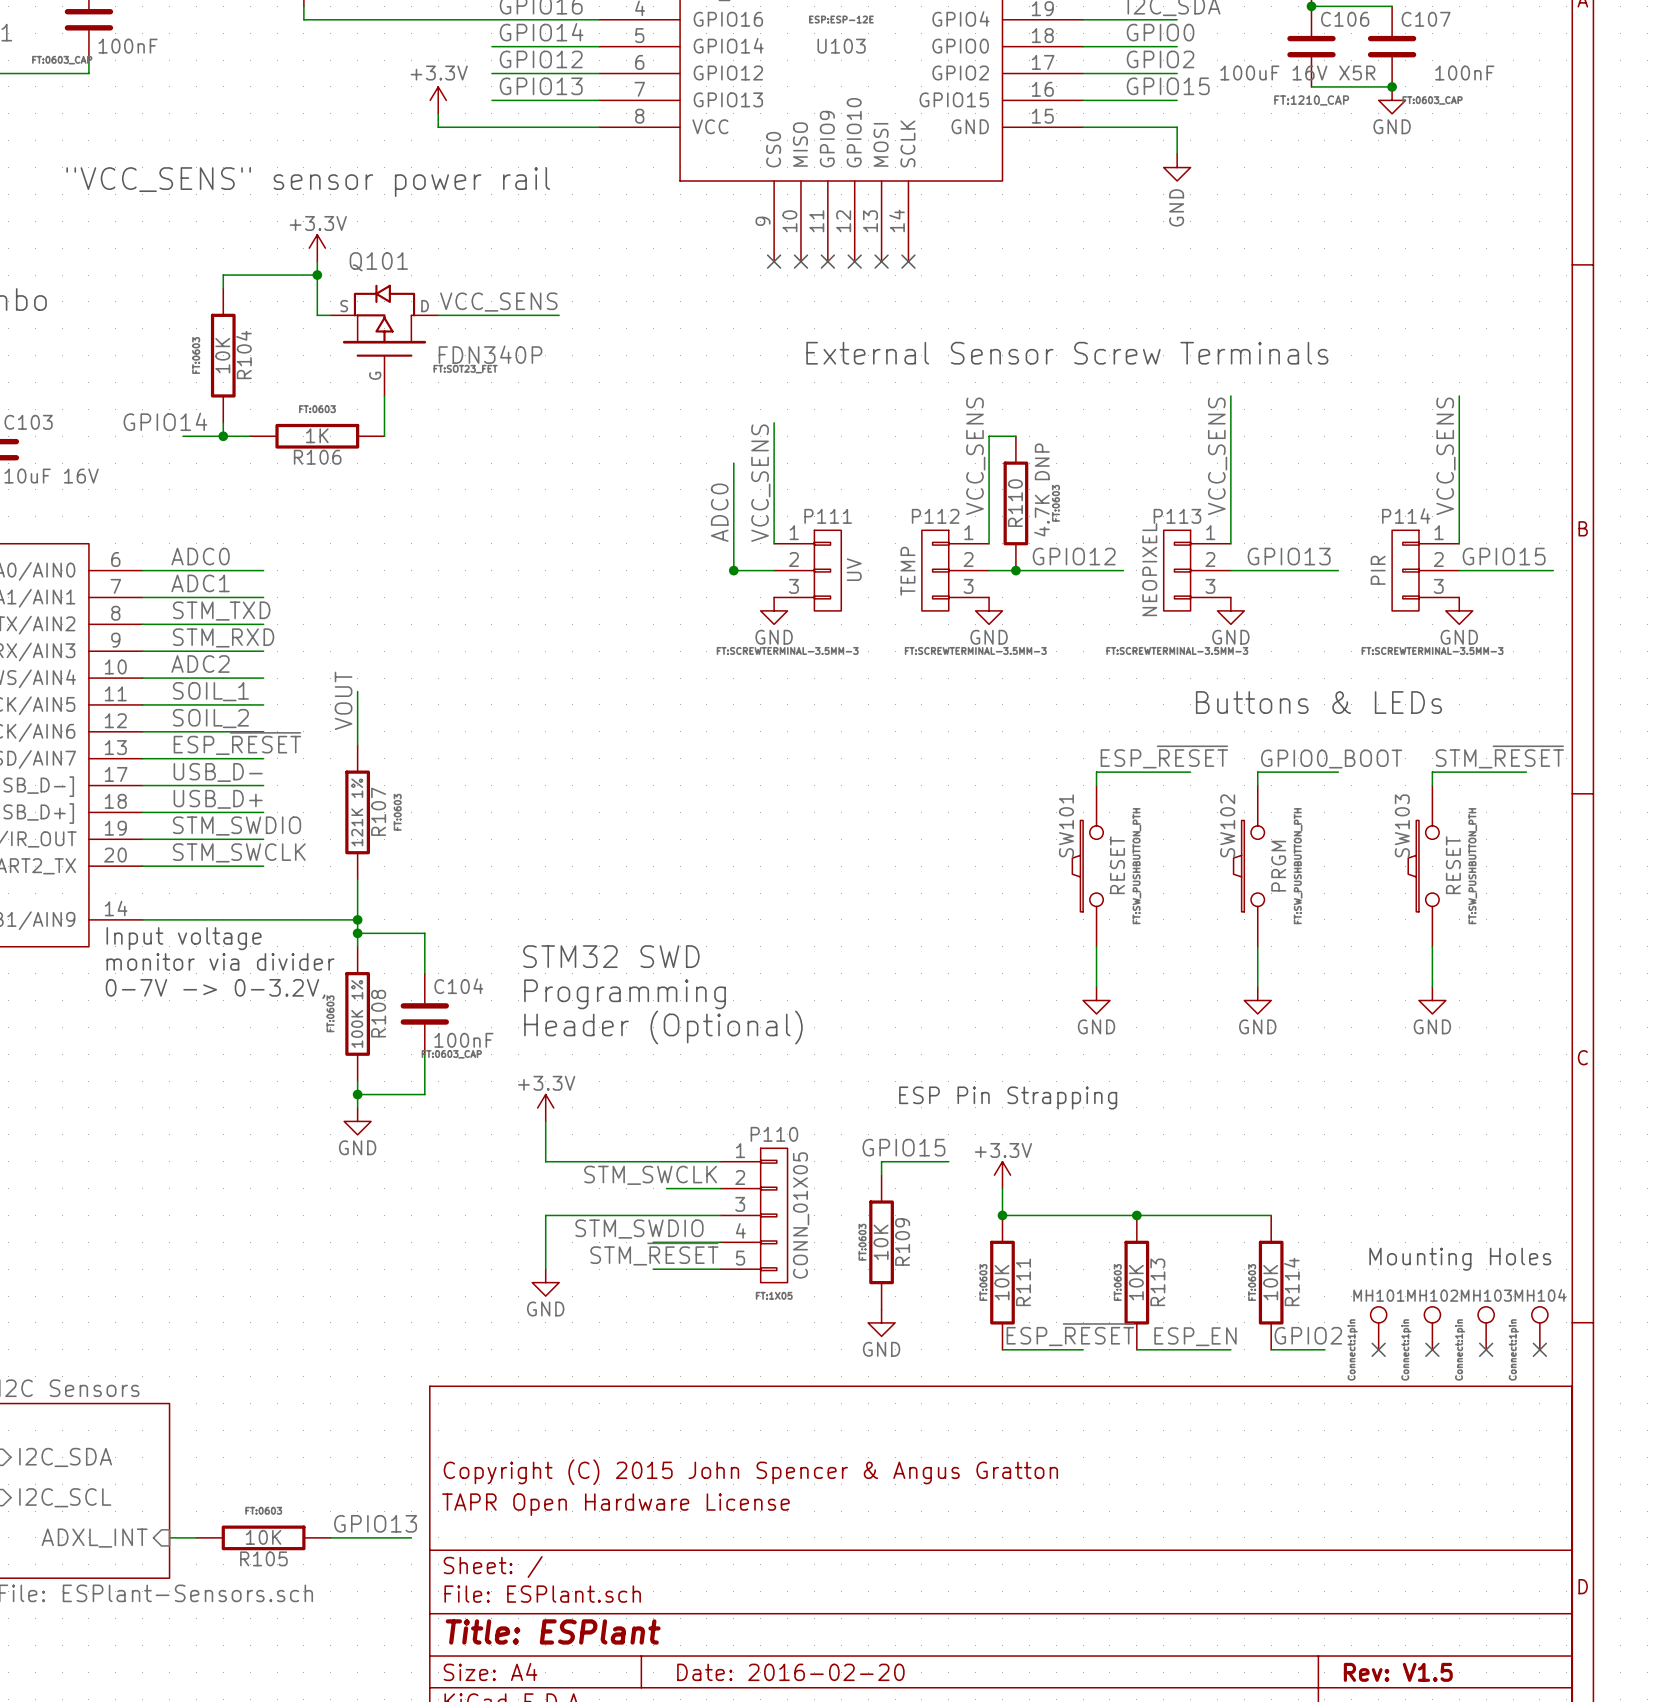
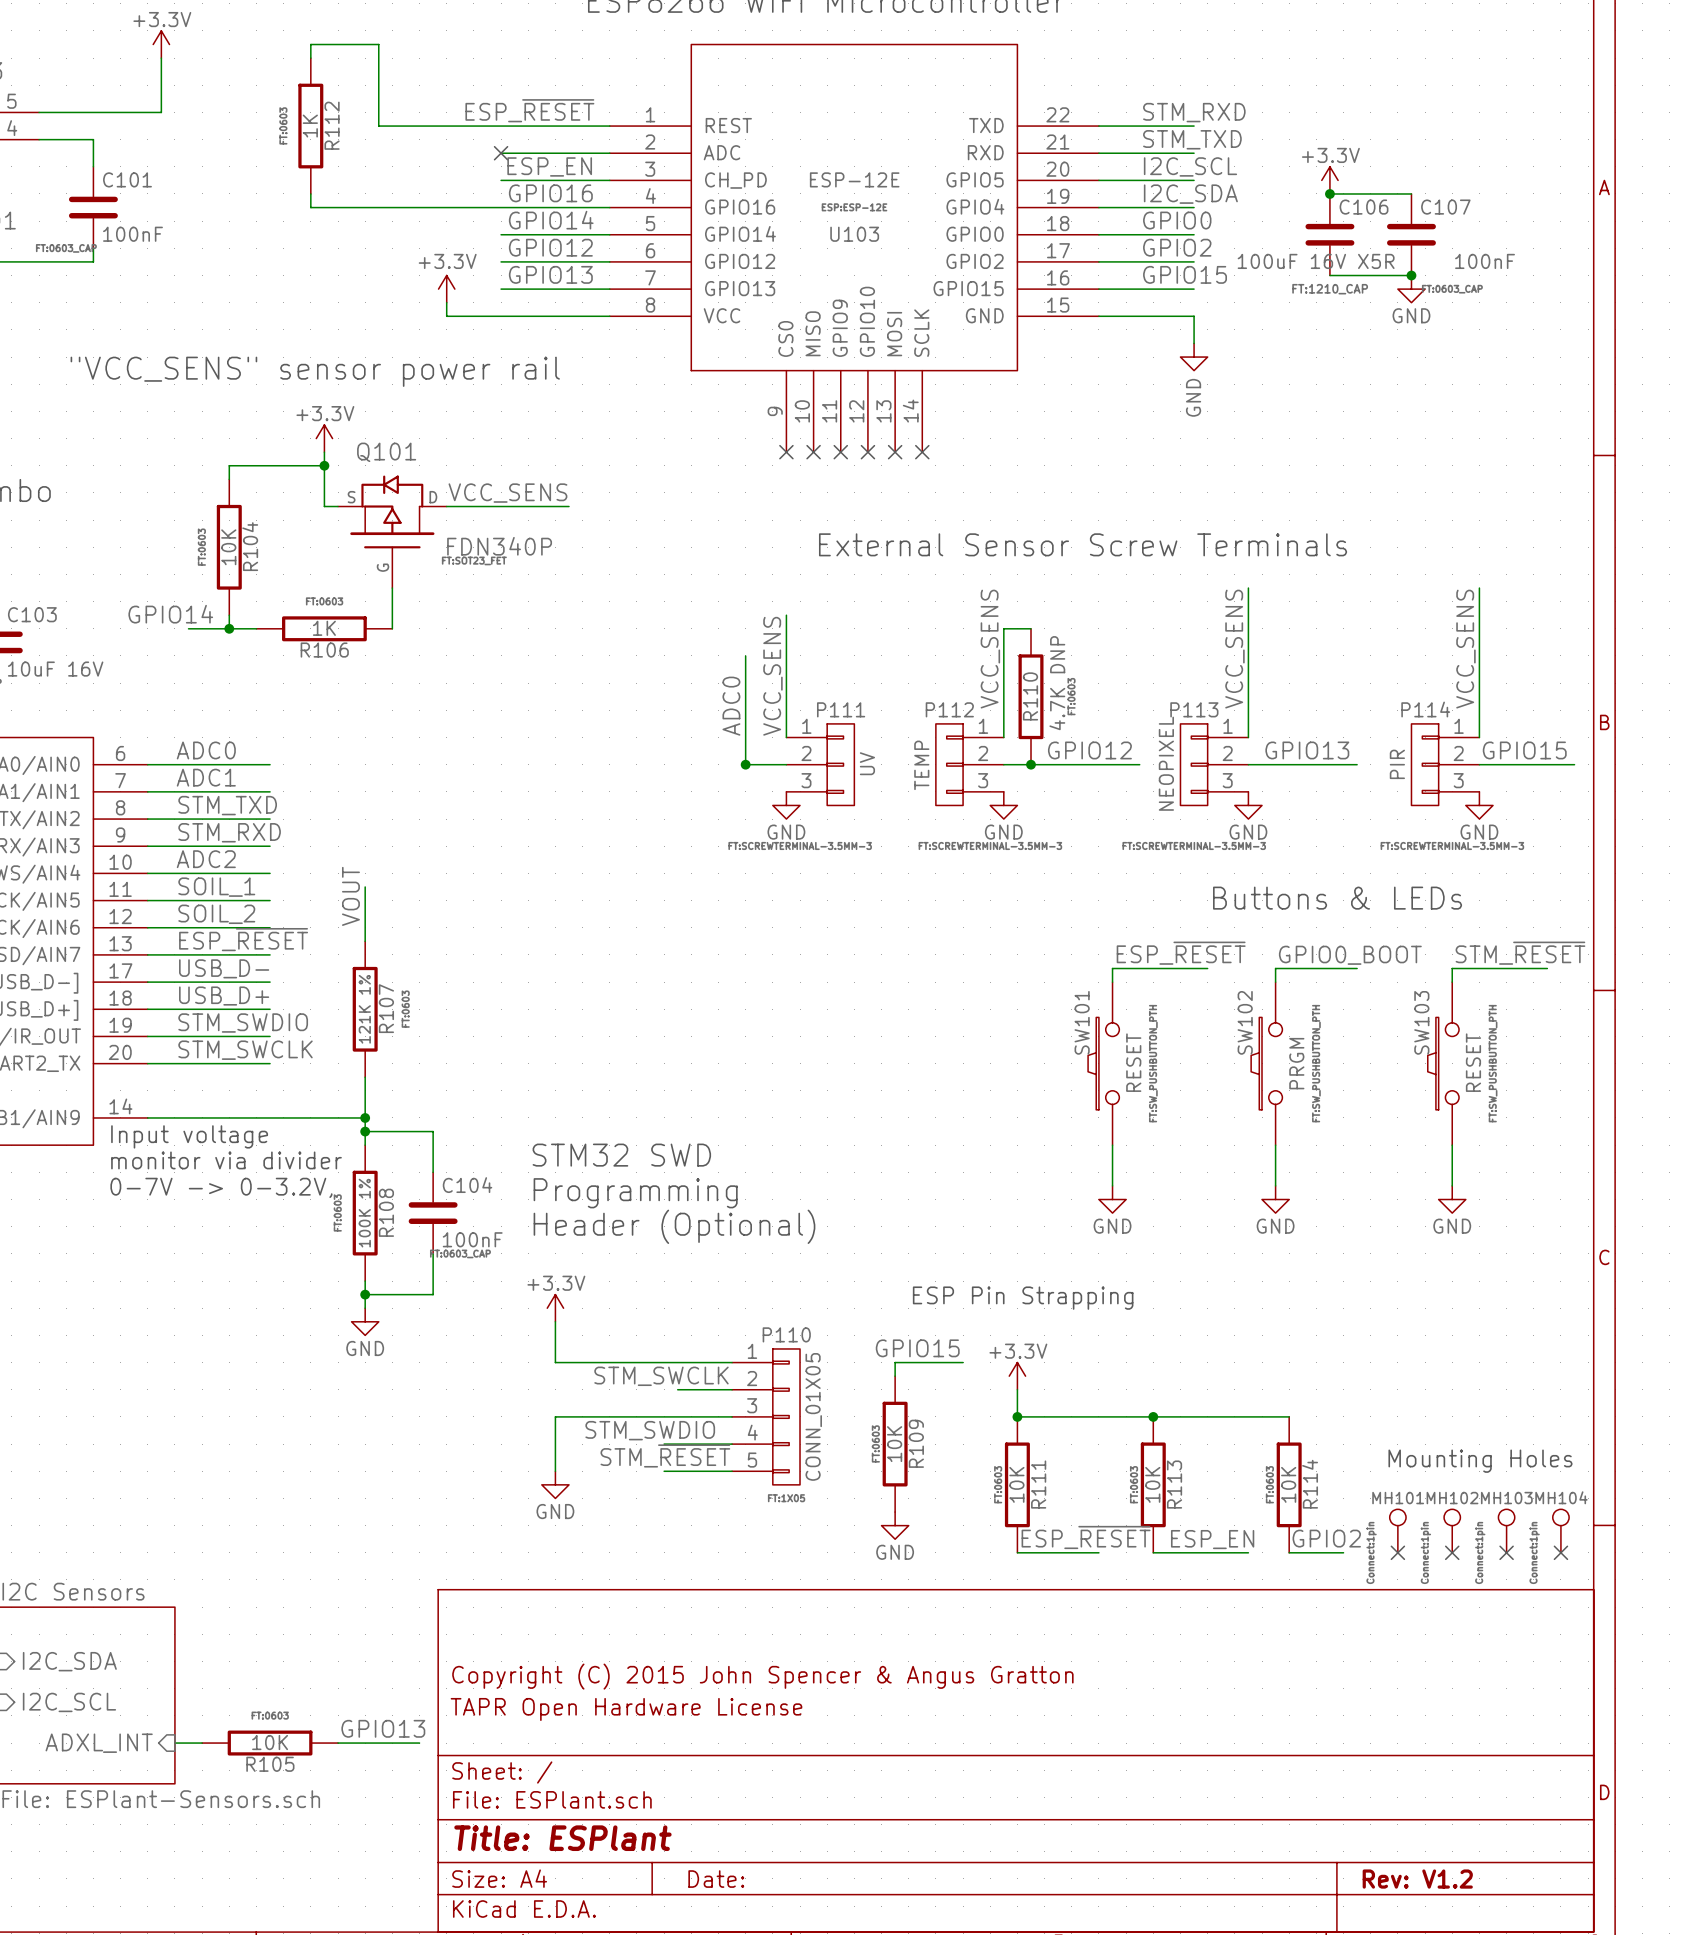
title block: Date: 2016-02-20 (790, 1672) -> Date: (716, 1879)
title block: Rev: V1.5 (1398, 1672) -> Rev: V1.2 (1417, 1879)

